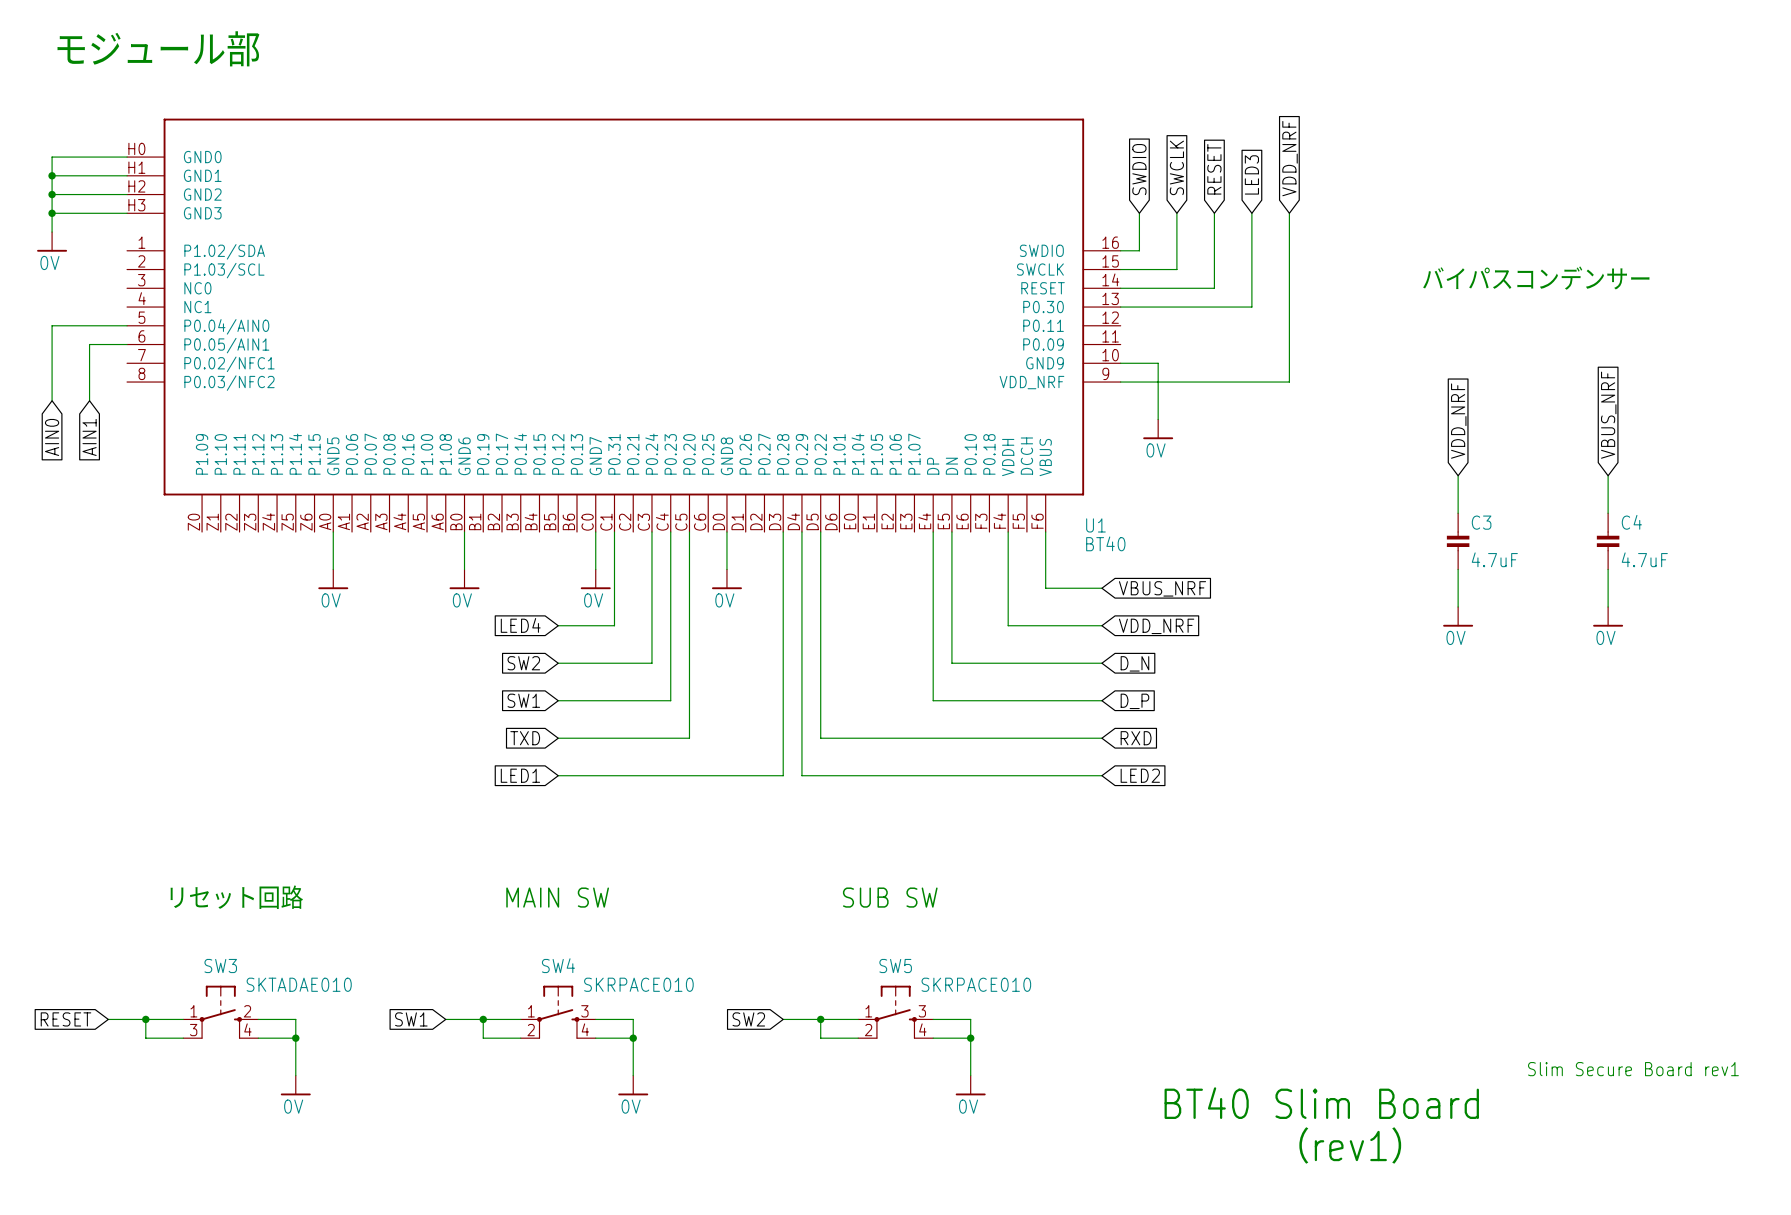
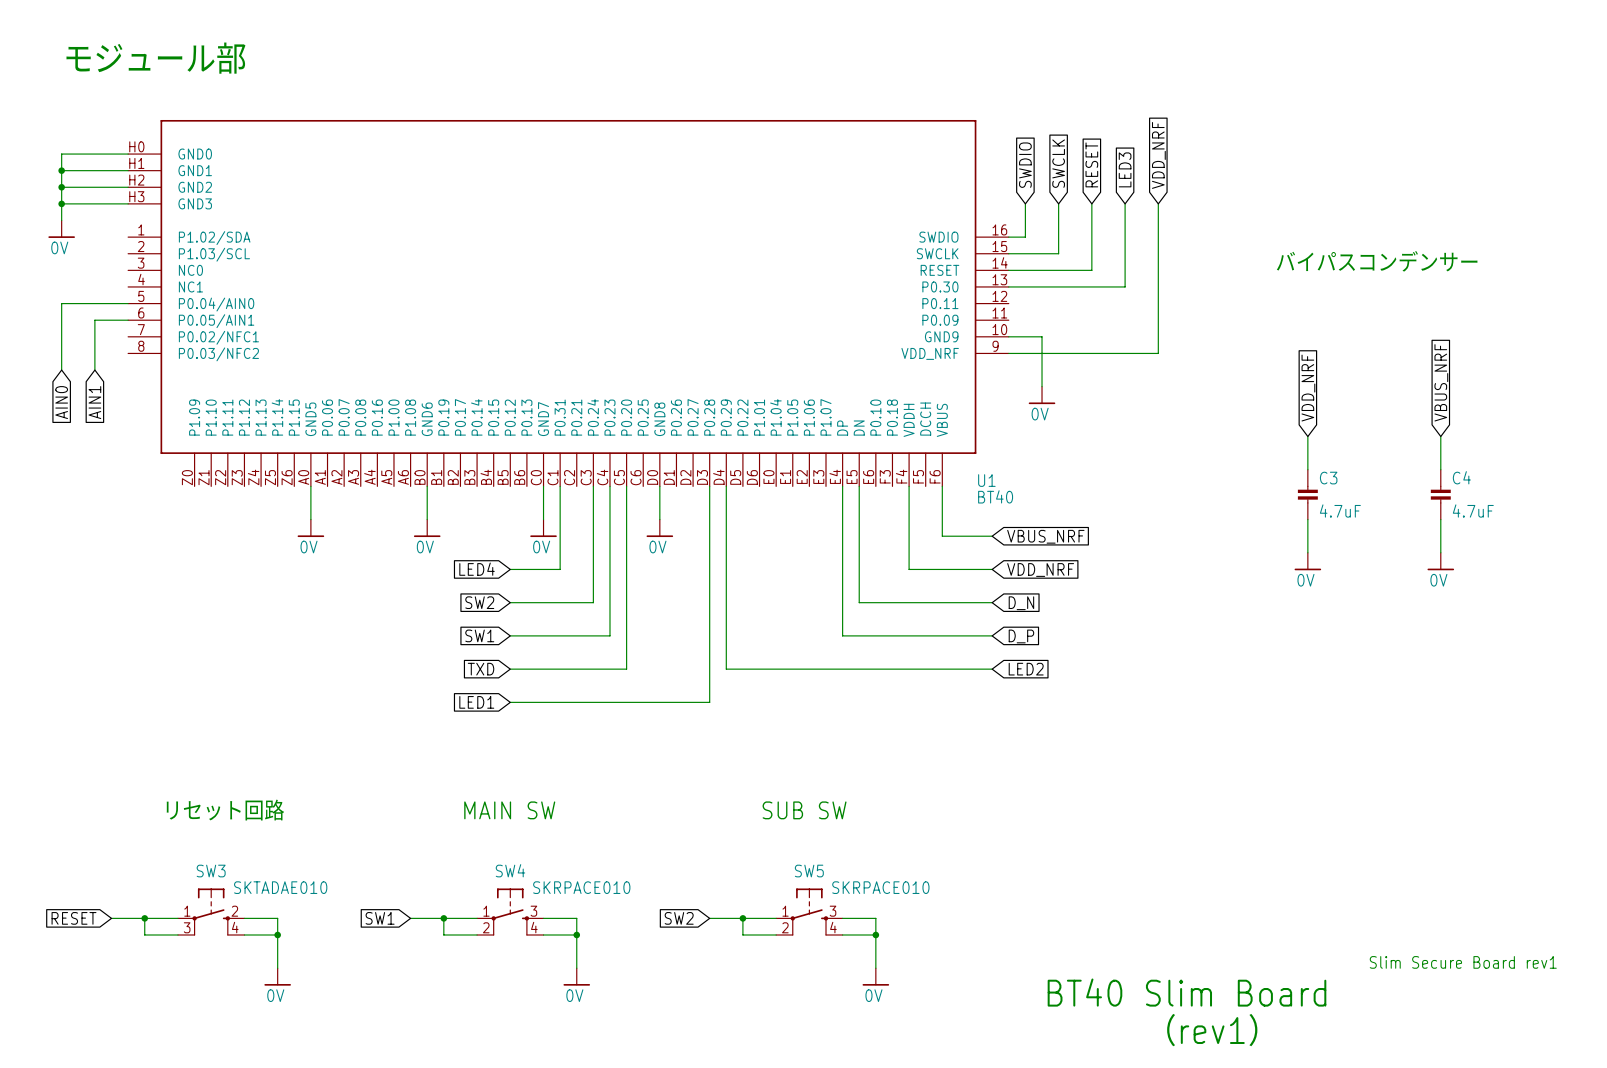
wire: (820, 532) (820, 738) -> (726, 669) (742, 669)
wire: (801, 738) (801, 775) (1101, 775) -> none
global label: RXD (1136, 738) -> LED2 (1026, 669)
global label: LED2 (1140, 775) -> none

